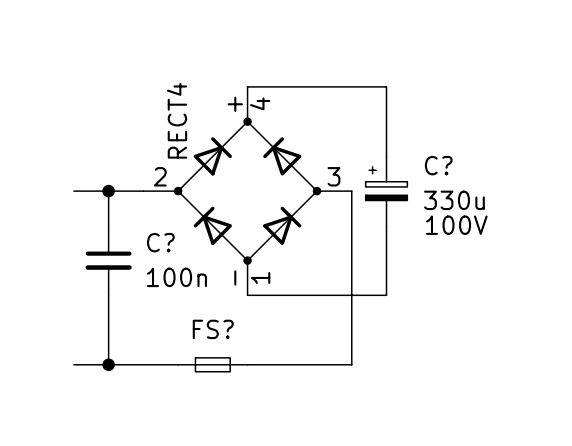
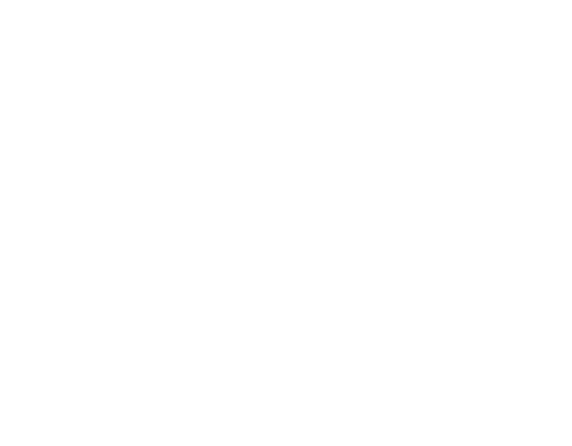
wire: (247, 86) (386, 86) (386, 156) -> none
wire: (73, 191) (143, 191) -> none
wire: (108, 191) (108, 225) -> none
junction: (108, 191) -> none
RECT4: (247, 191) -> none
wire: (351, 191) (351, 364) (247, 364) -> none
C?: 330u (386, 191) -> none
wire: (386, 225) (386, 295) (247, 295) -> none
C?: 100n (108, 260) -> none
wire: (108, 295) (108, 364) -> none
wire: (73, 364) (178, 364) -> none
junction: (108, 364) -> none
FS?: (212, 364) -> none

